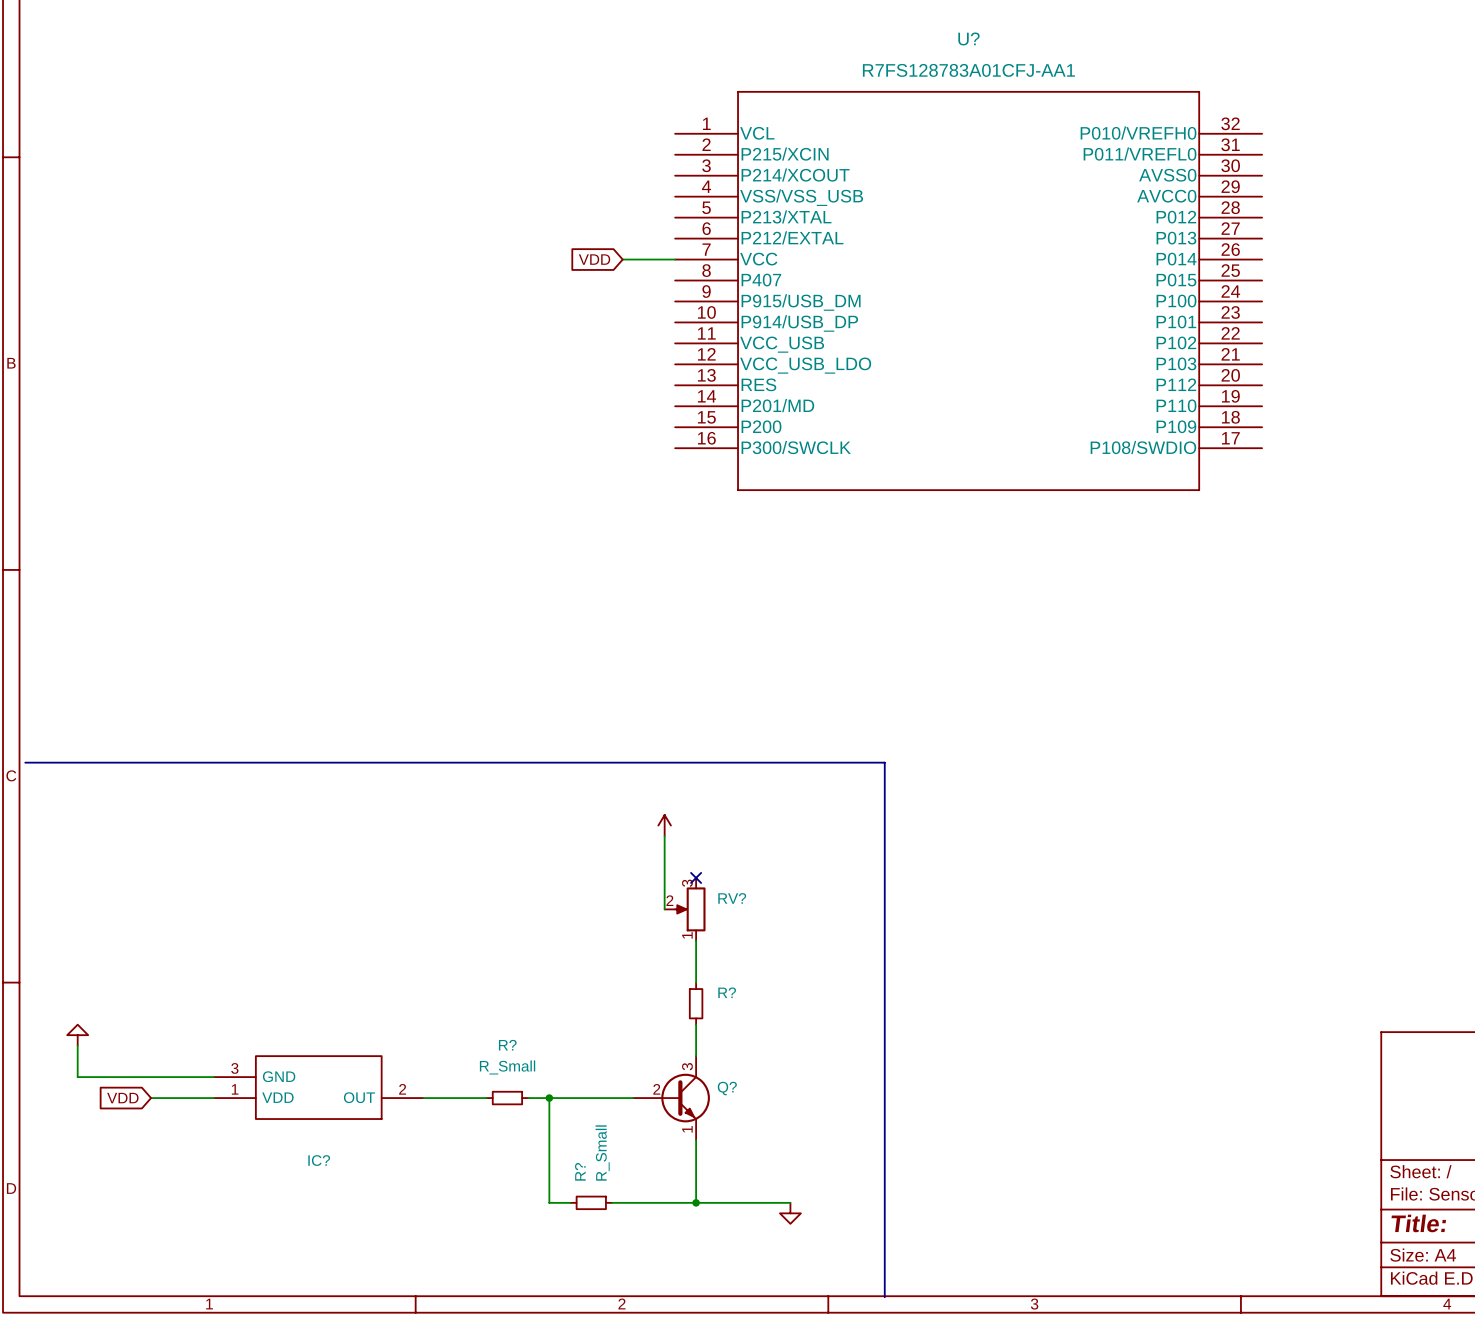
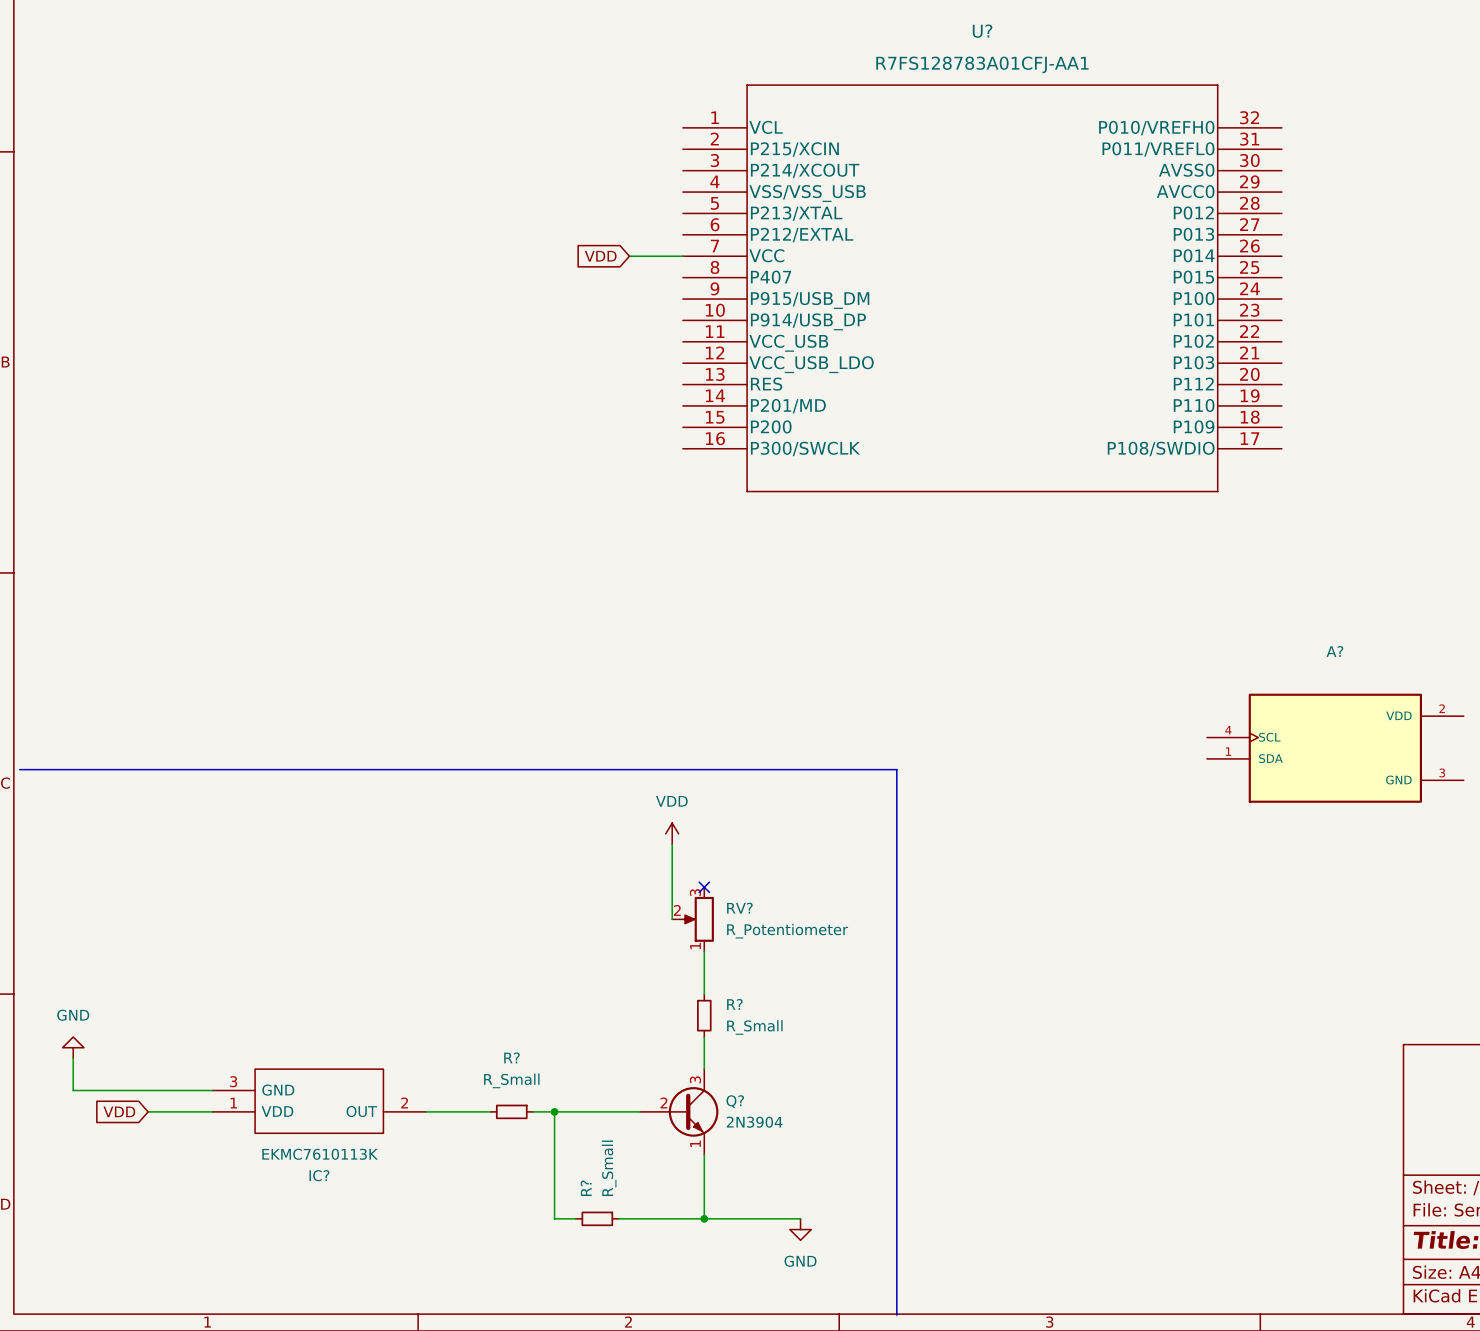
A?: none -> (1335, 748)
power symbol text: none -> VDD (671, 801)
RV? value: none -> R_Potentiometer (787, 931)
power symbol text: none -> GND (73, 1015)
R? value: none -> R_Small (754, 1027)
Q? value: none -> 2N3904 (754, 1122)
IC? value: none -> EKMC7610113K (320, 1154)
power symbol text: none -> GND (800, 1261)

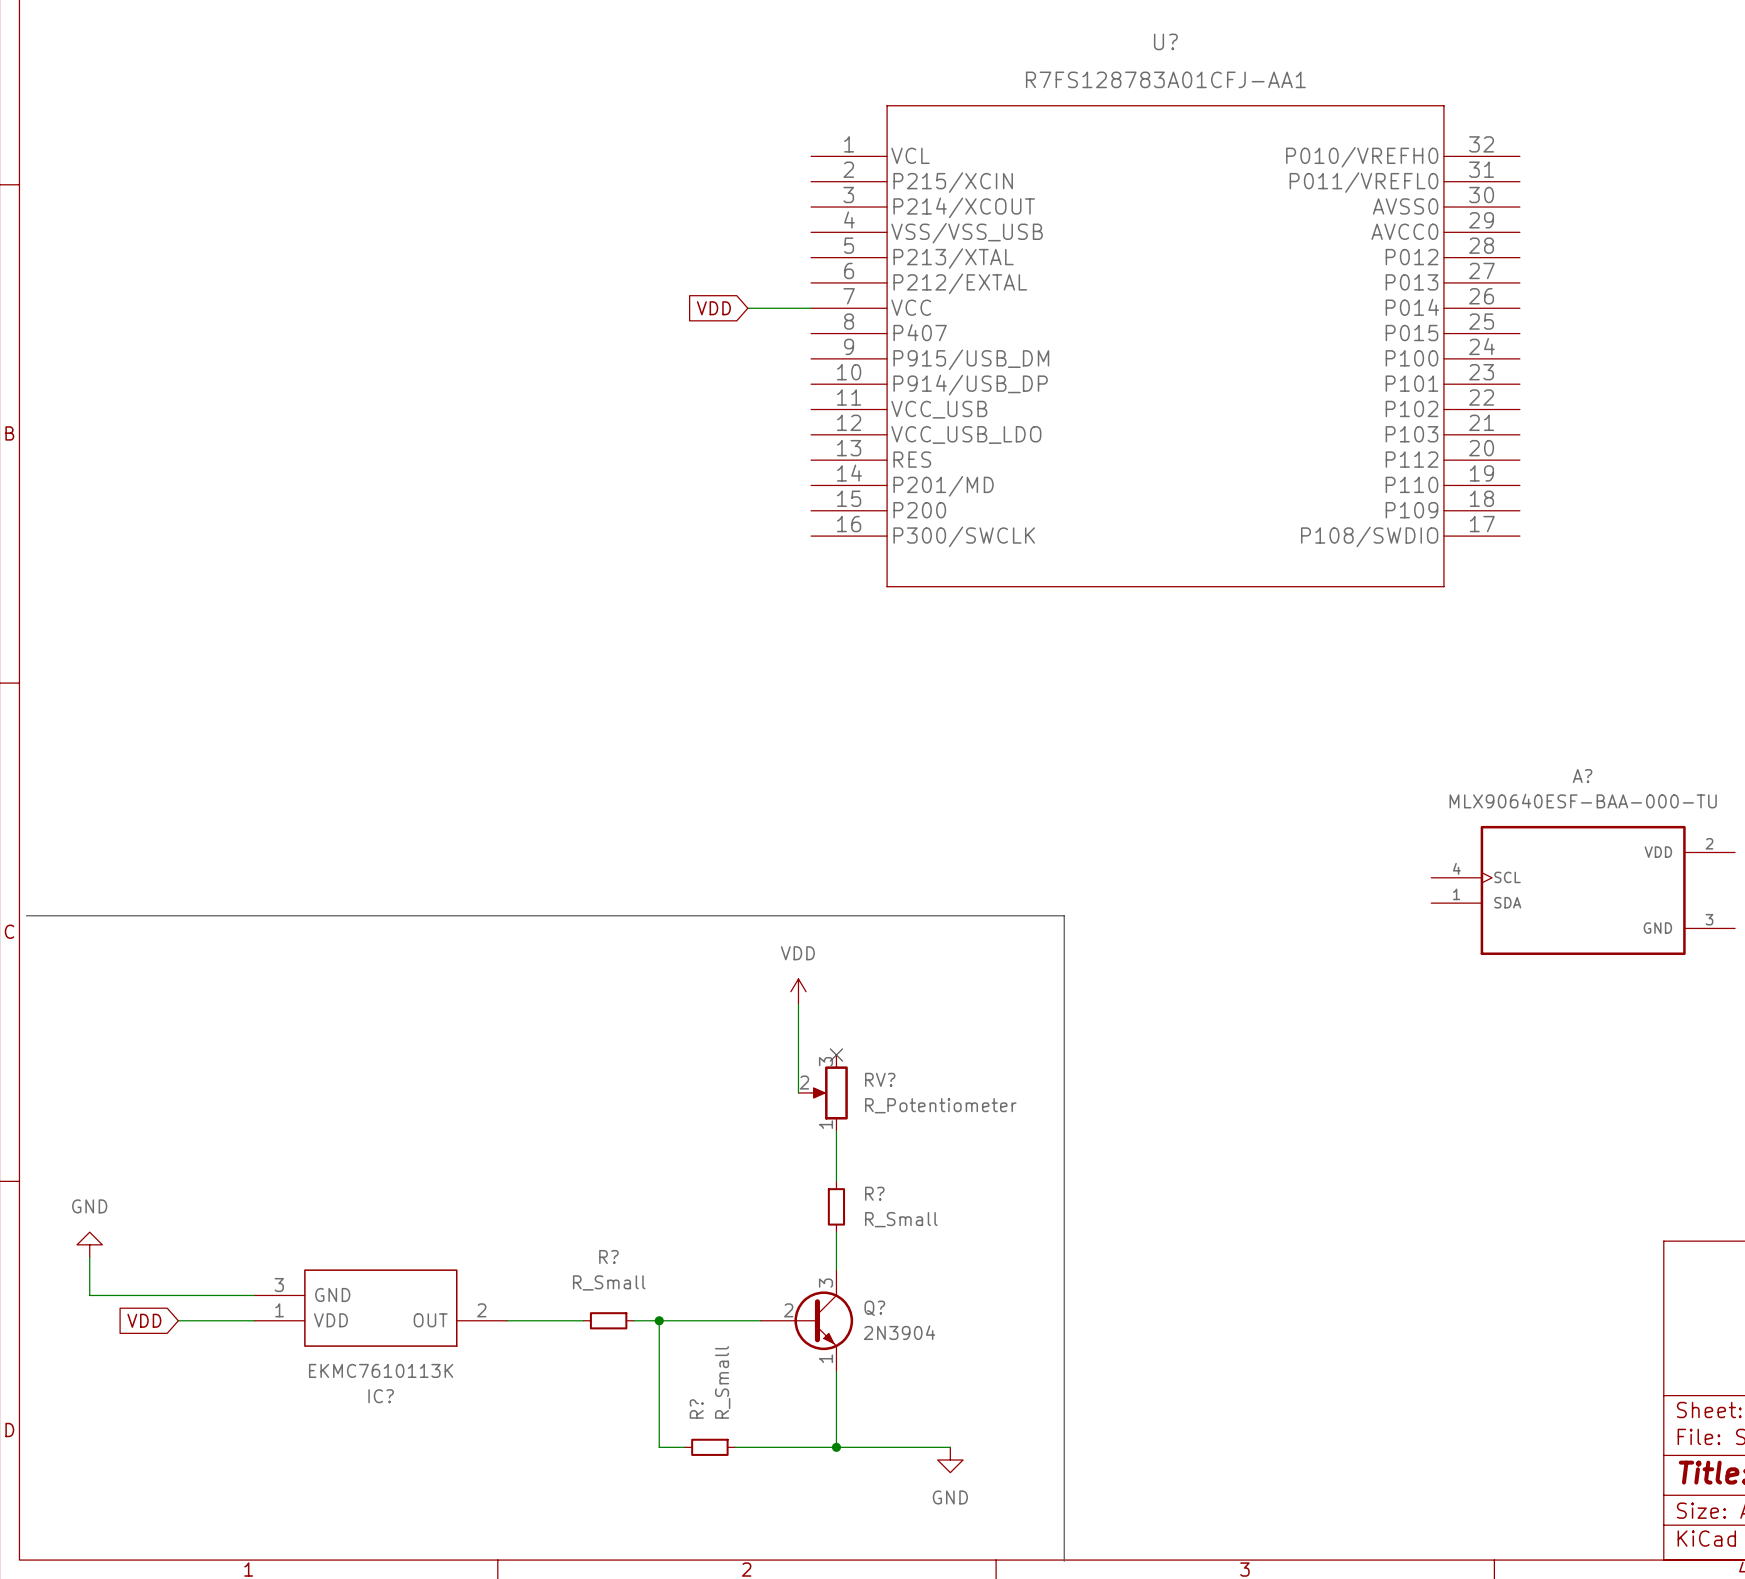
A? value: none -> MLX90640ESF-BAA-000-TU (1583, 801)

